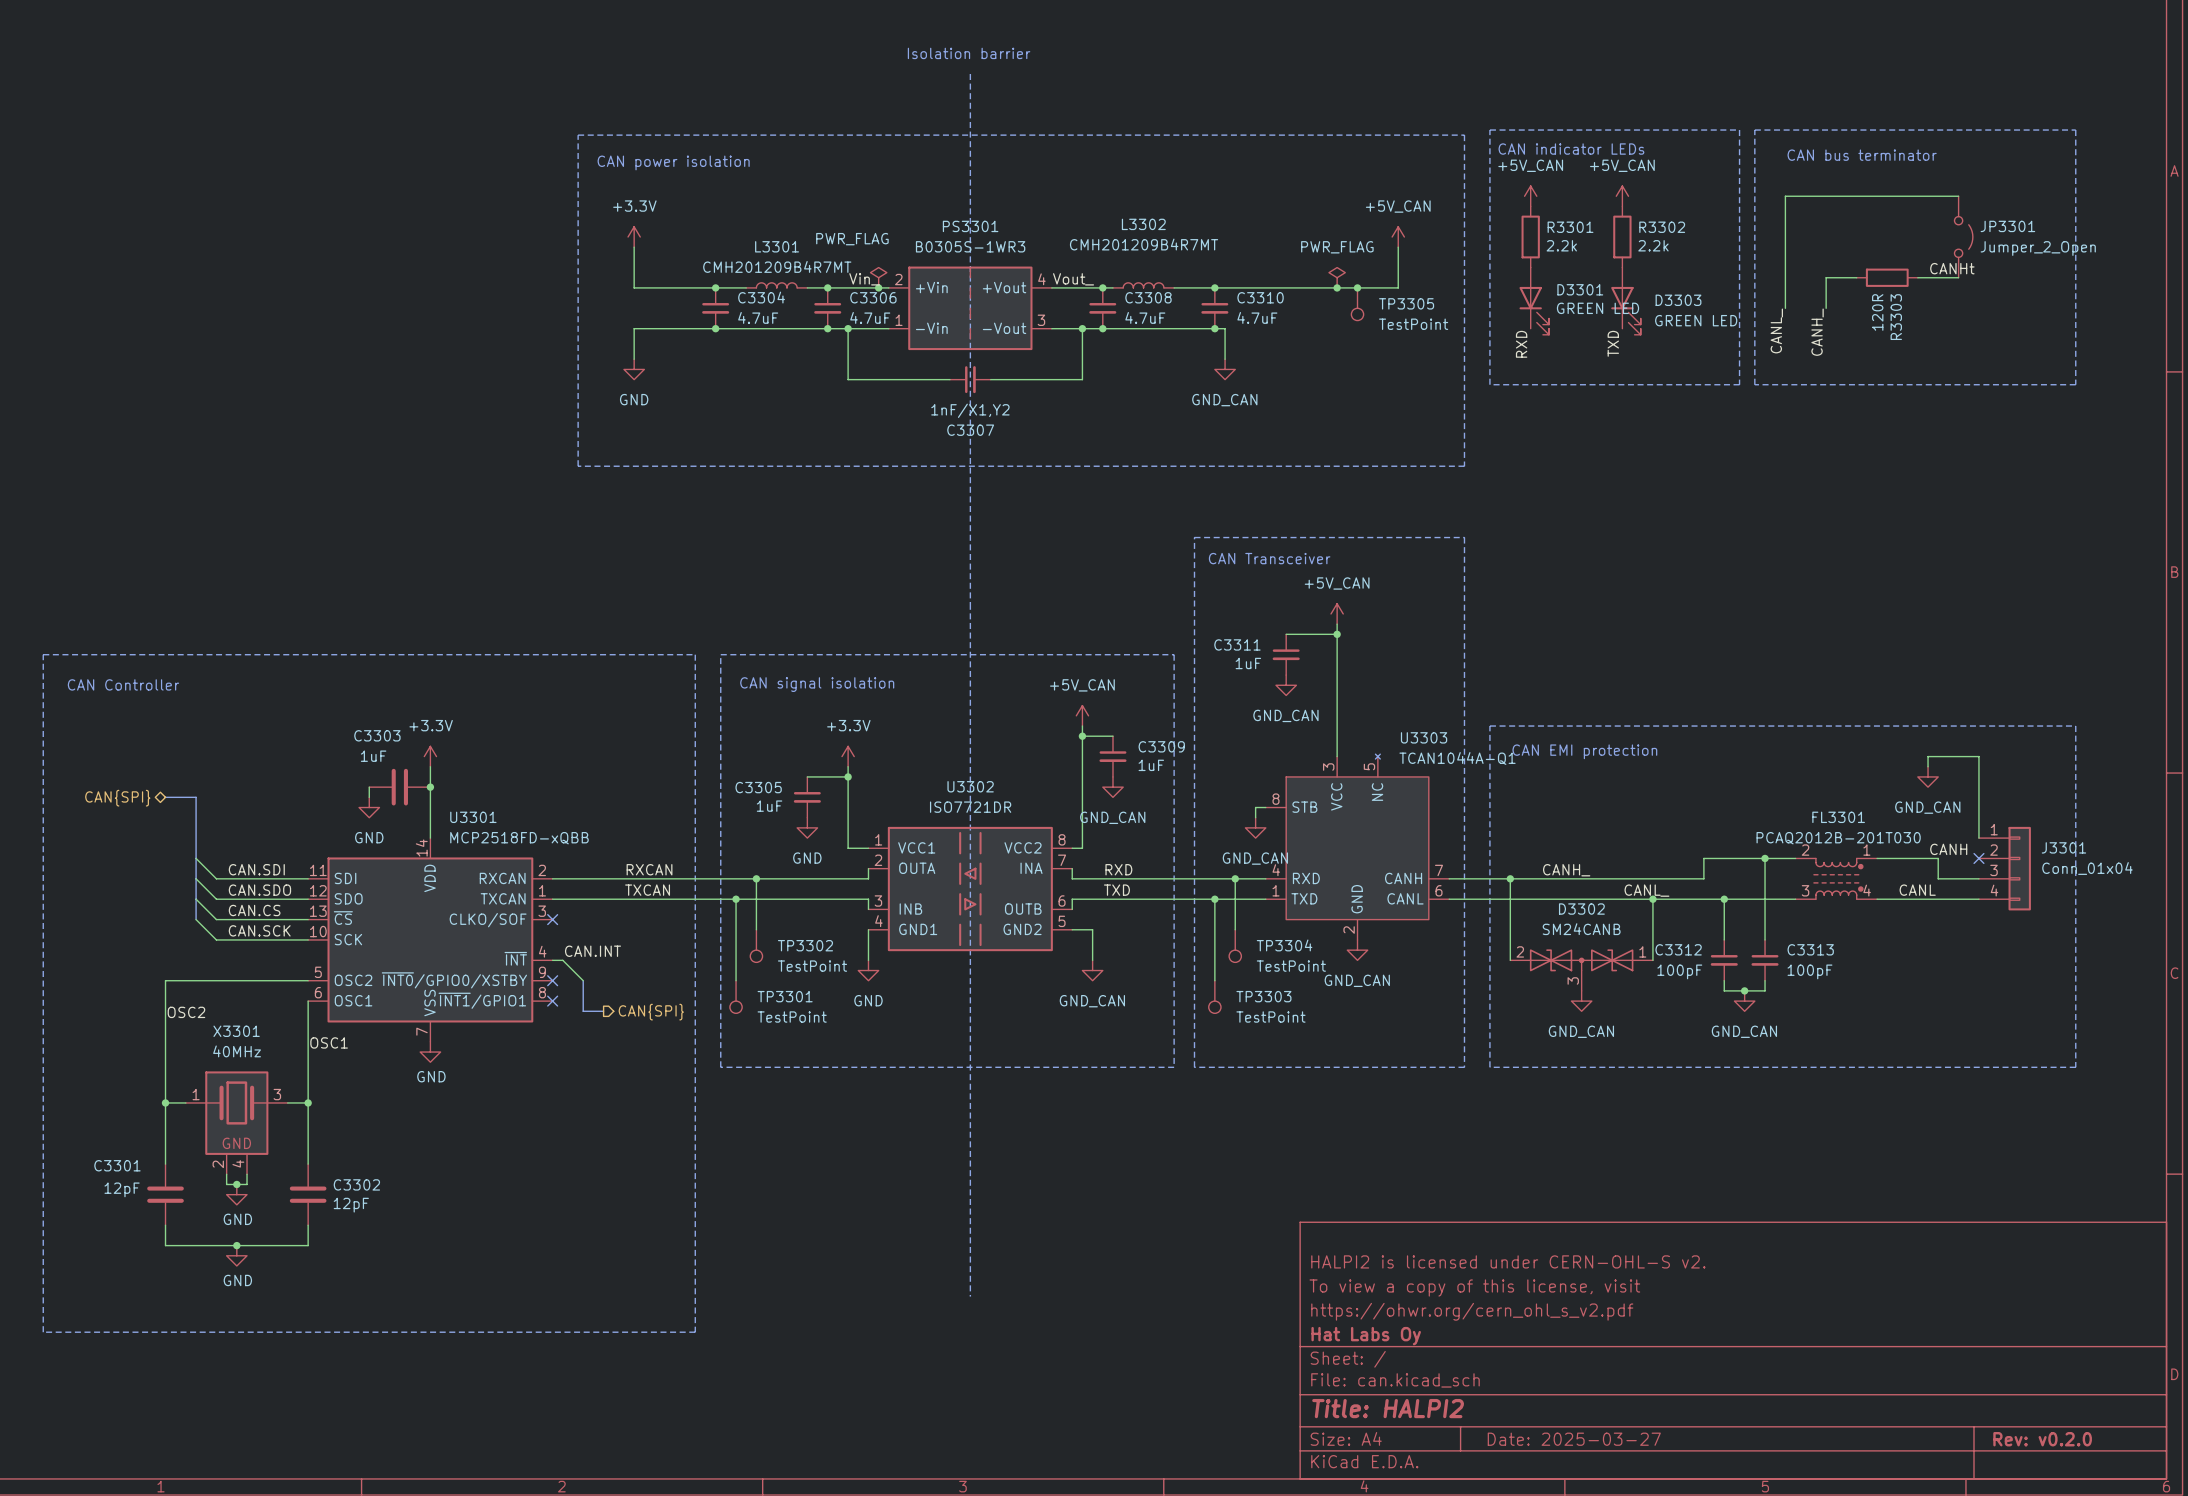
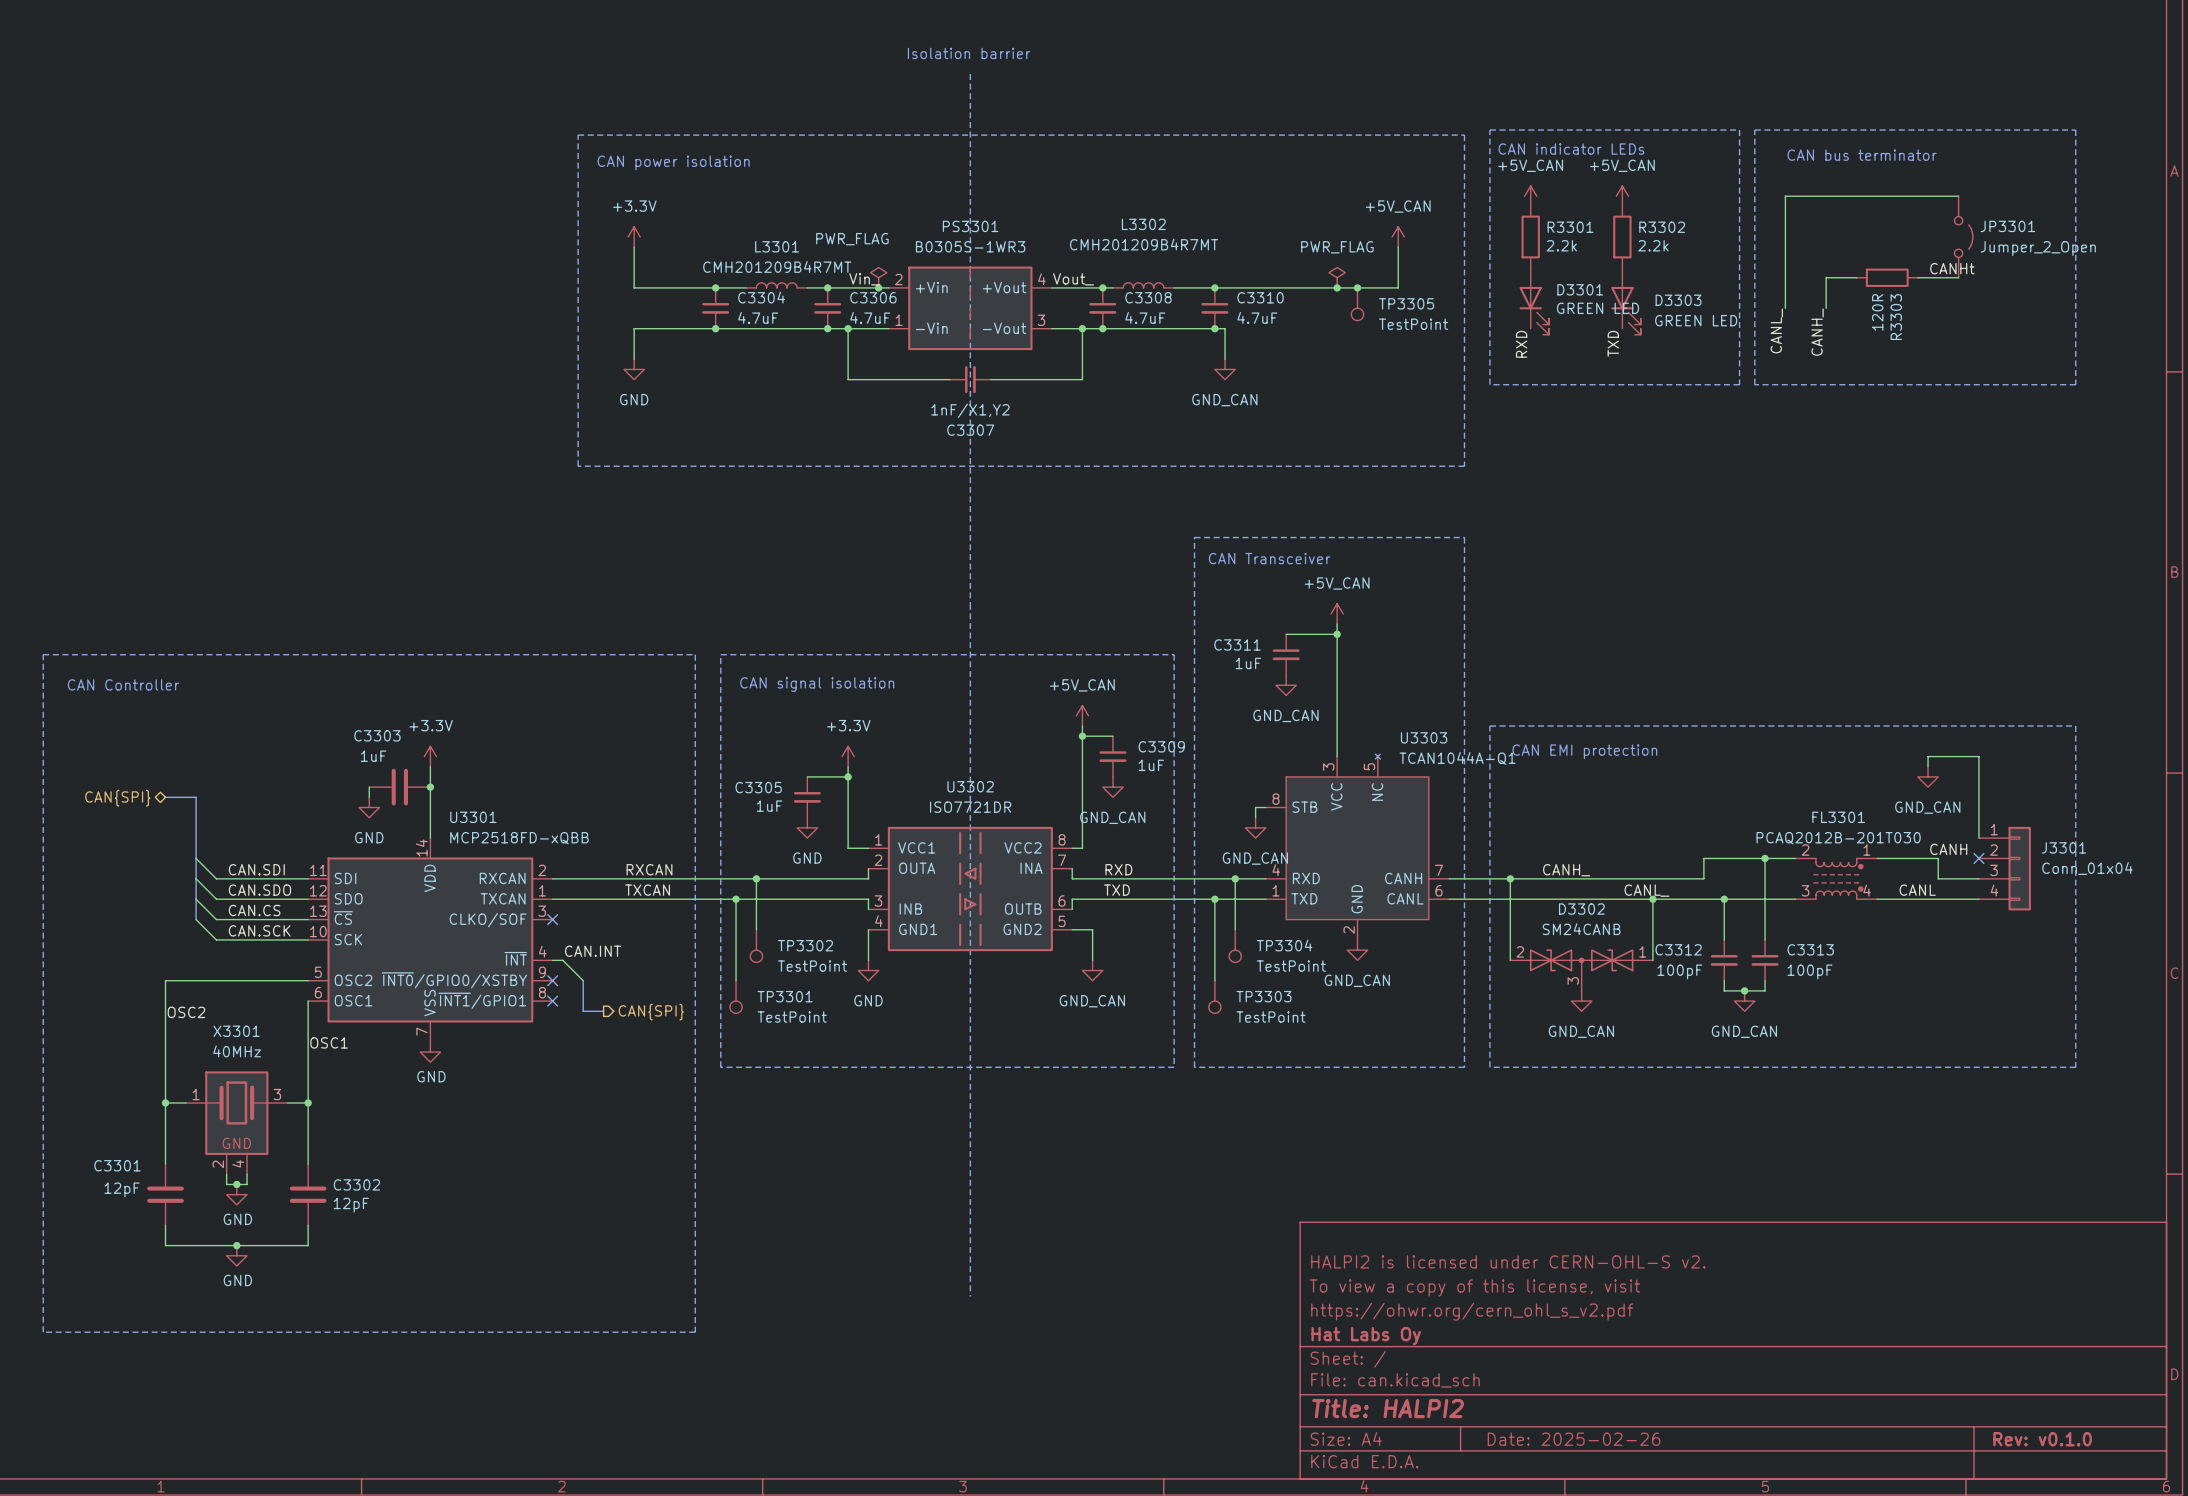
title block: Date: 2025-03-27 (1574, 1439) -> Date: 2025-02-26 (1573, 1439)
title block: Rev: v0.2.0 (2042, 1439) -> Rev: v0.1.0 (2042, 1439)

